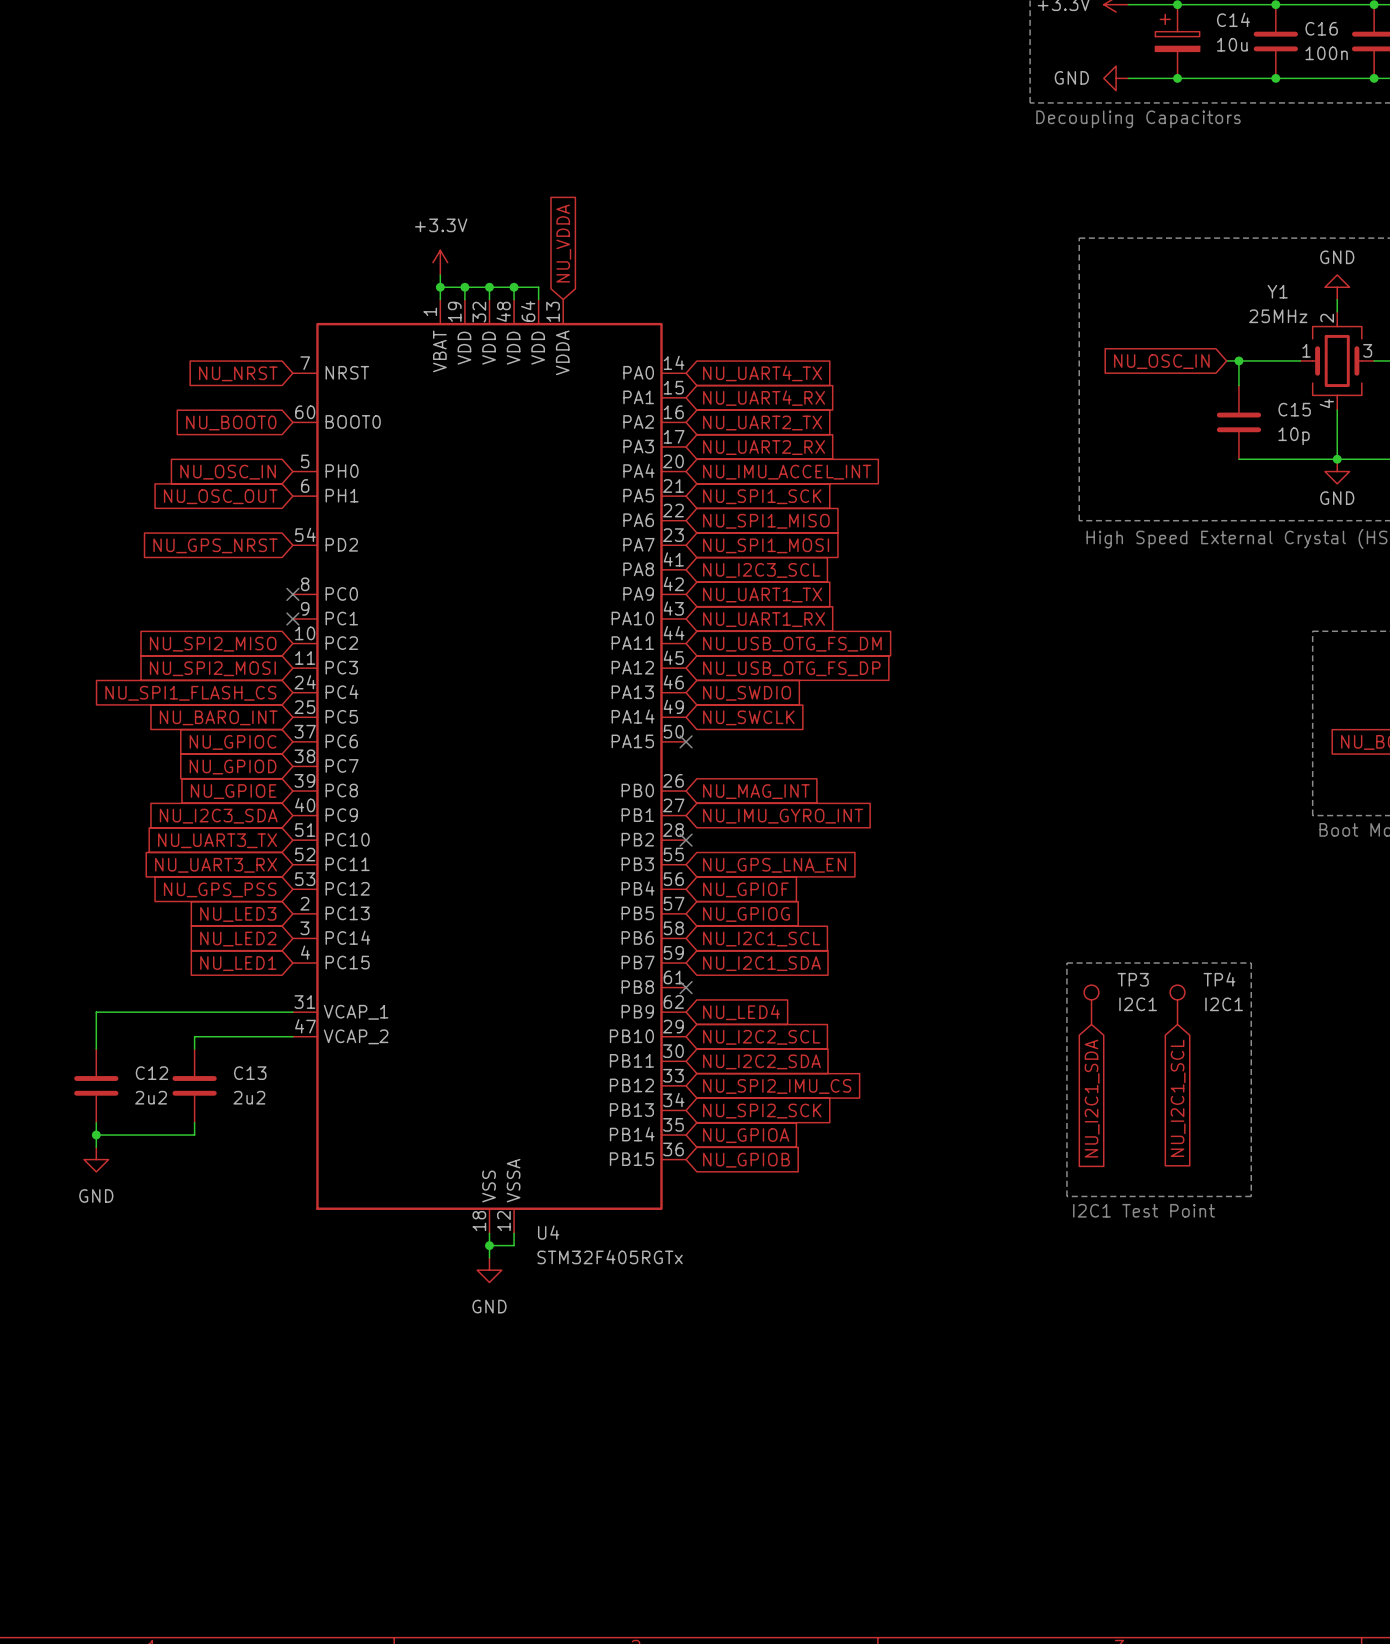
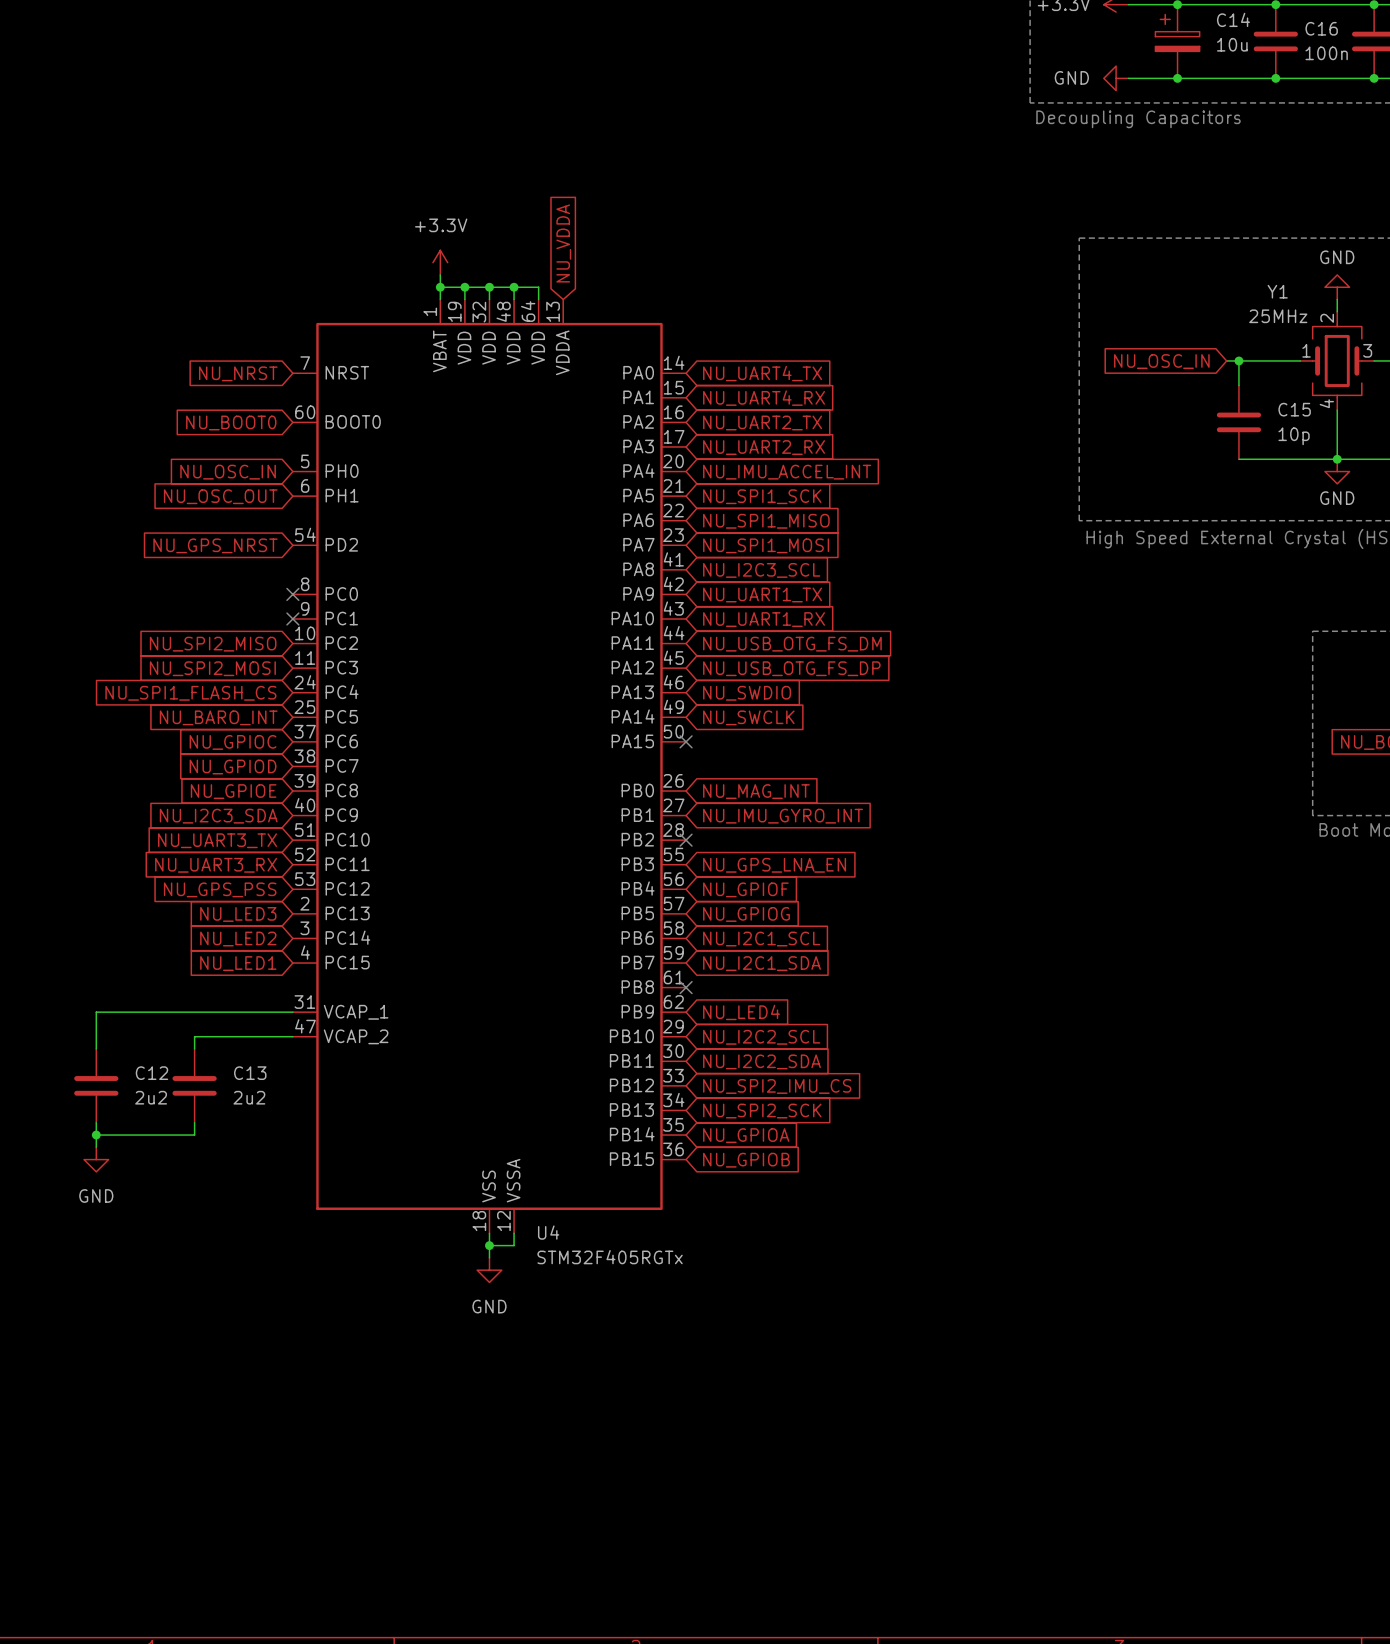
line: (1066, 963) (1251, 963) (1251, 1196) (1066, 1196) (1066, 963) -> none
TP3: I2C1 (1091, 1004) -> none
TP4: I2C1 (1177, 1004) -> none
global label: NU_I2C1_SDA (1092, 1098) -> none
global label: NU_I2C1_SCL (1178, 1098) -> none
text: I2C1 Test Point (1144, 1210) -> none

